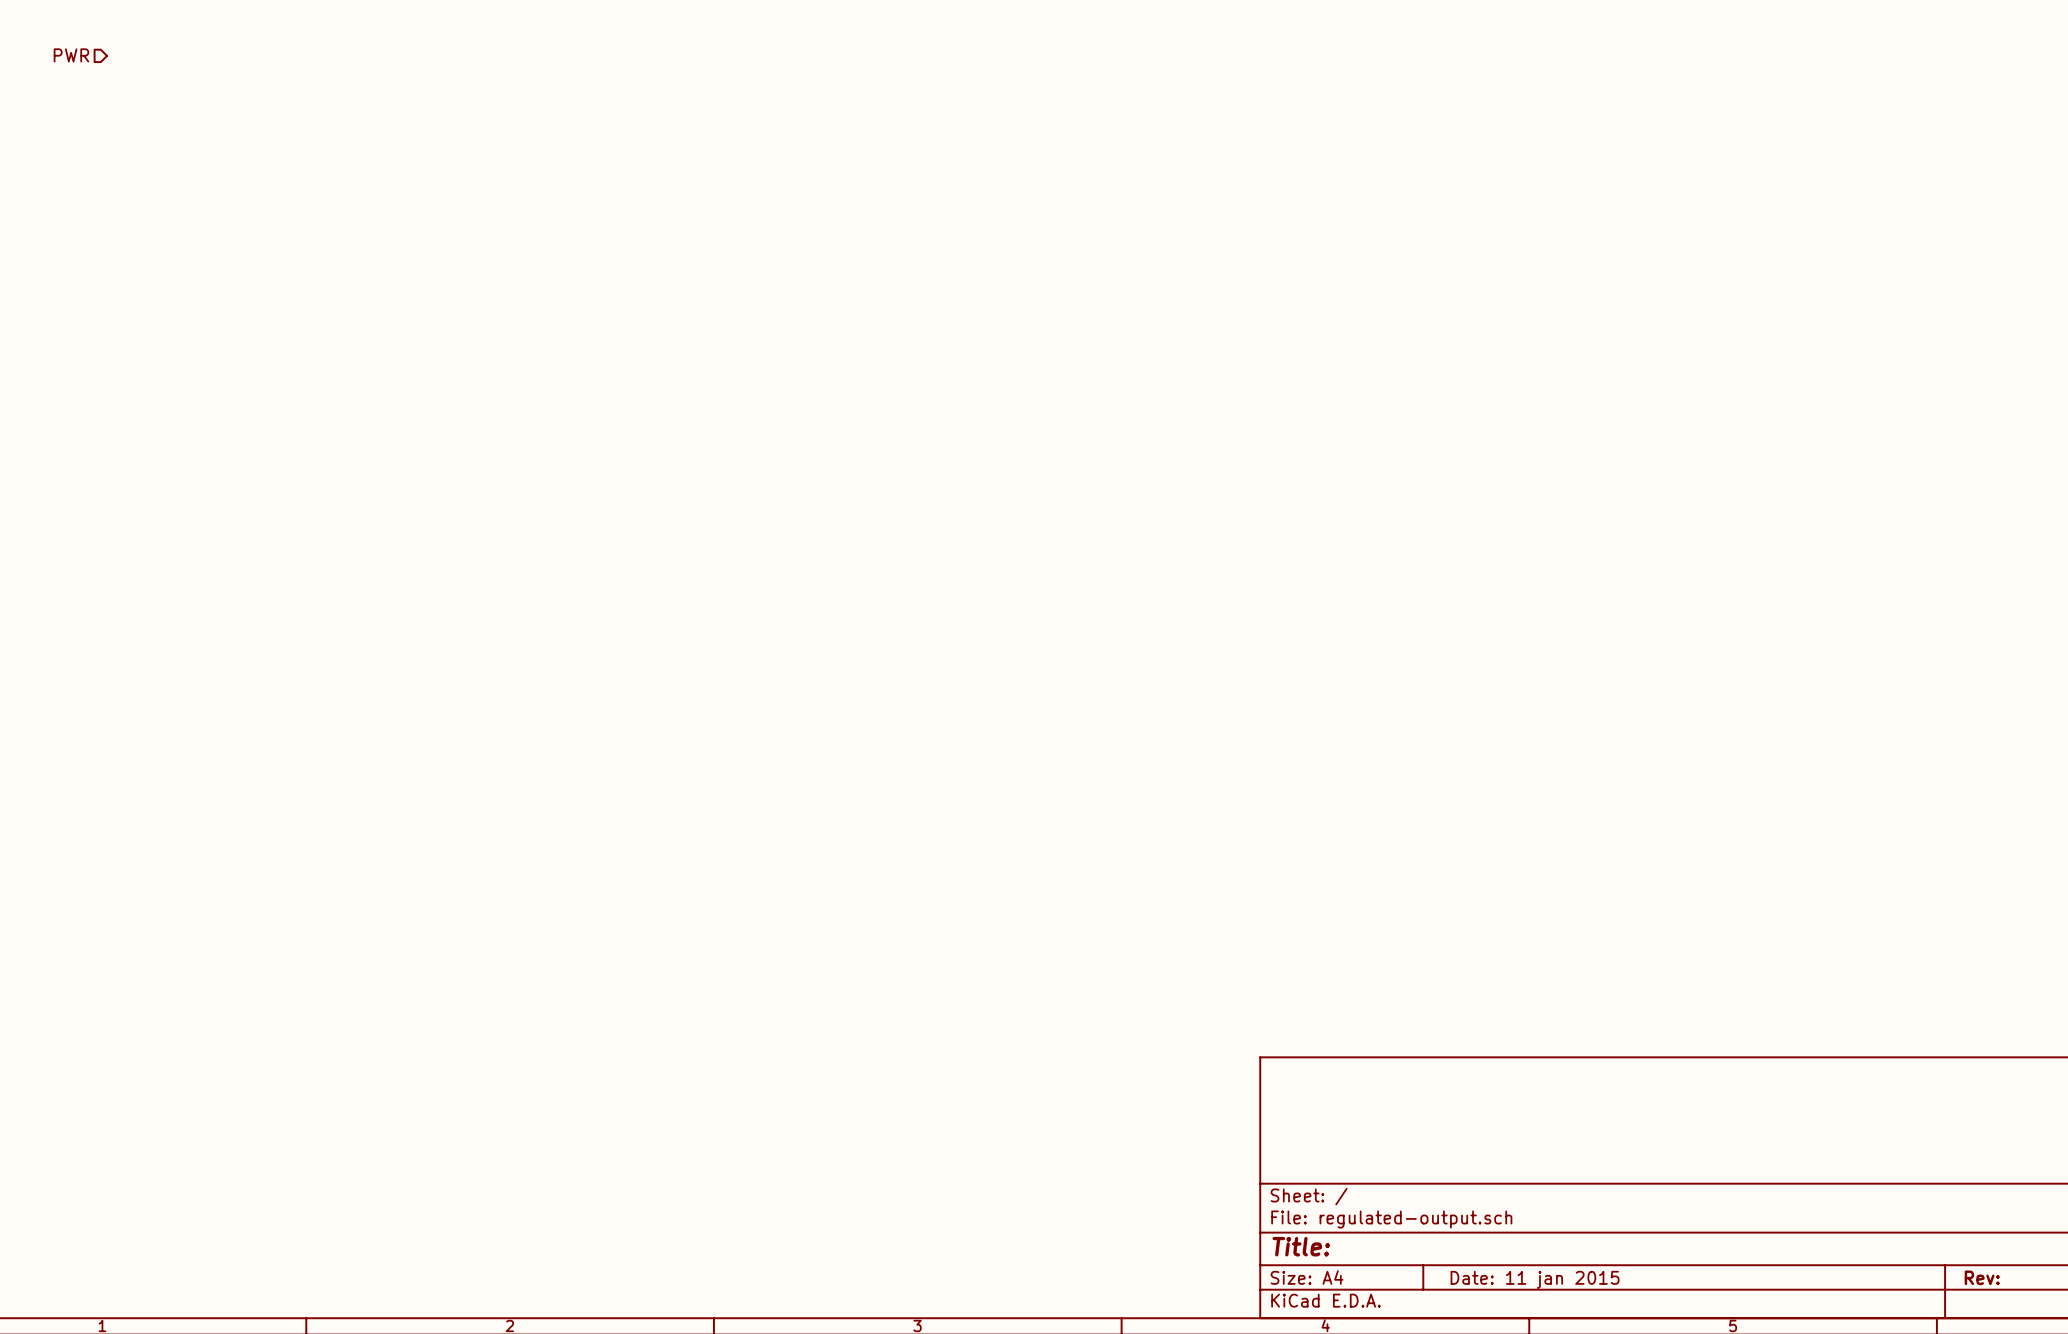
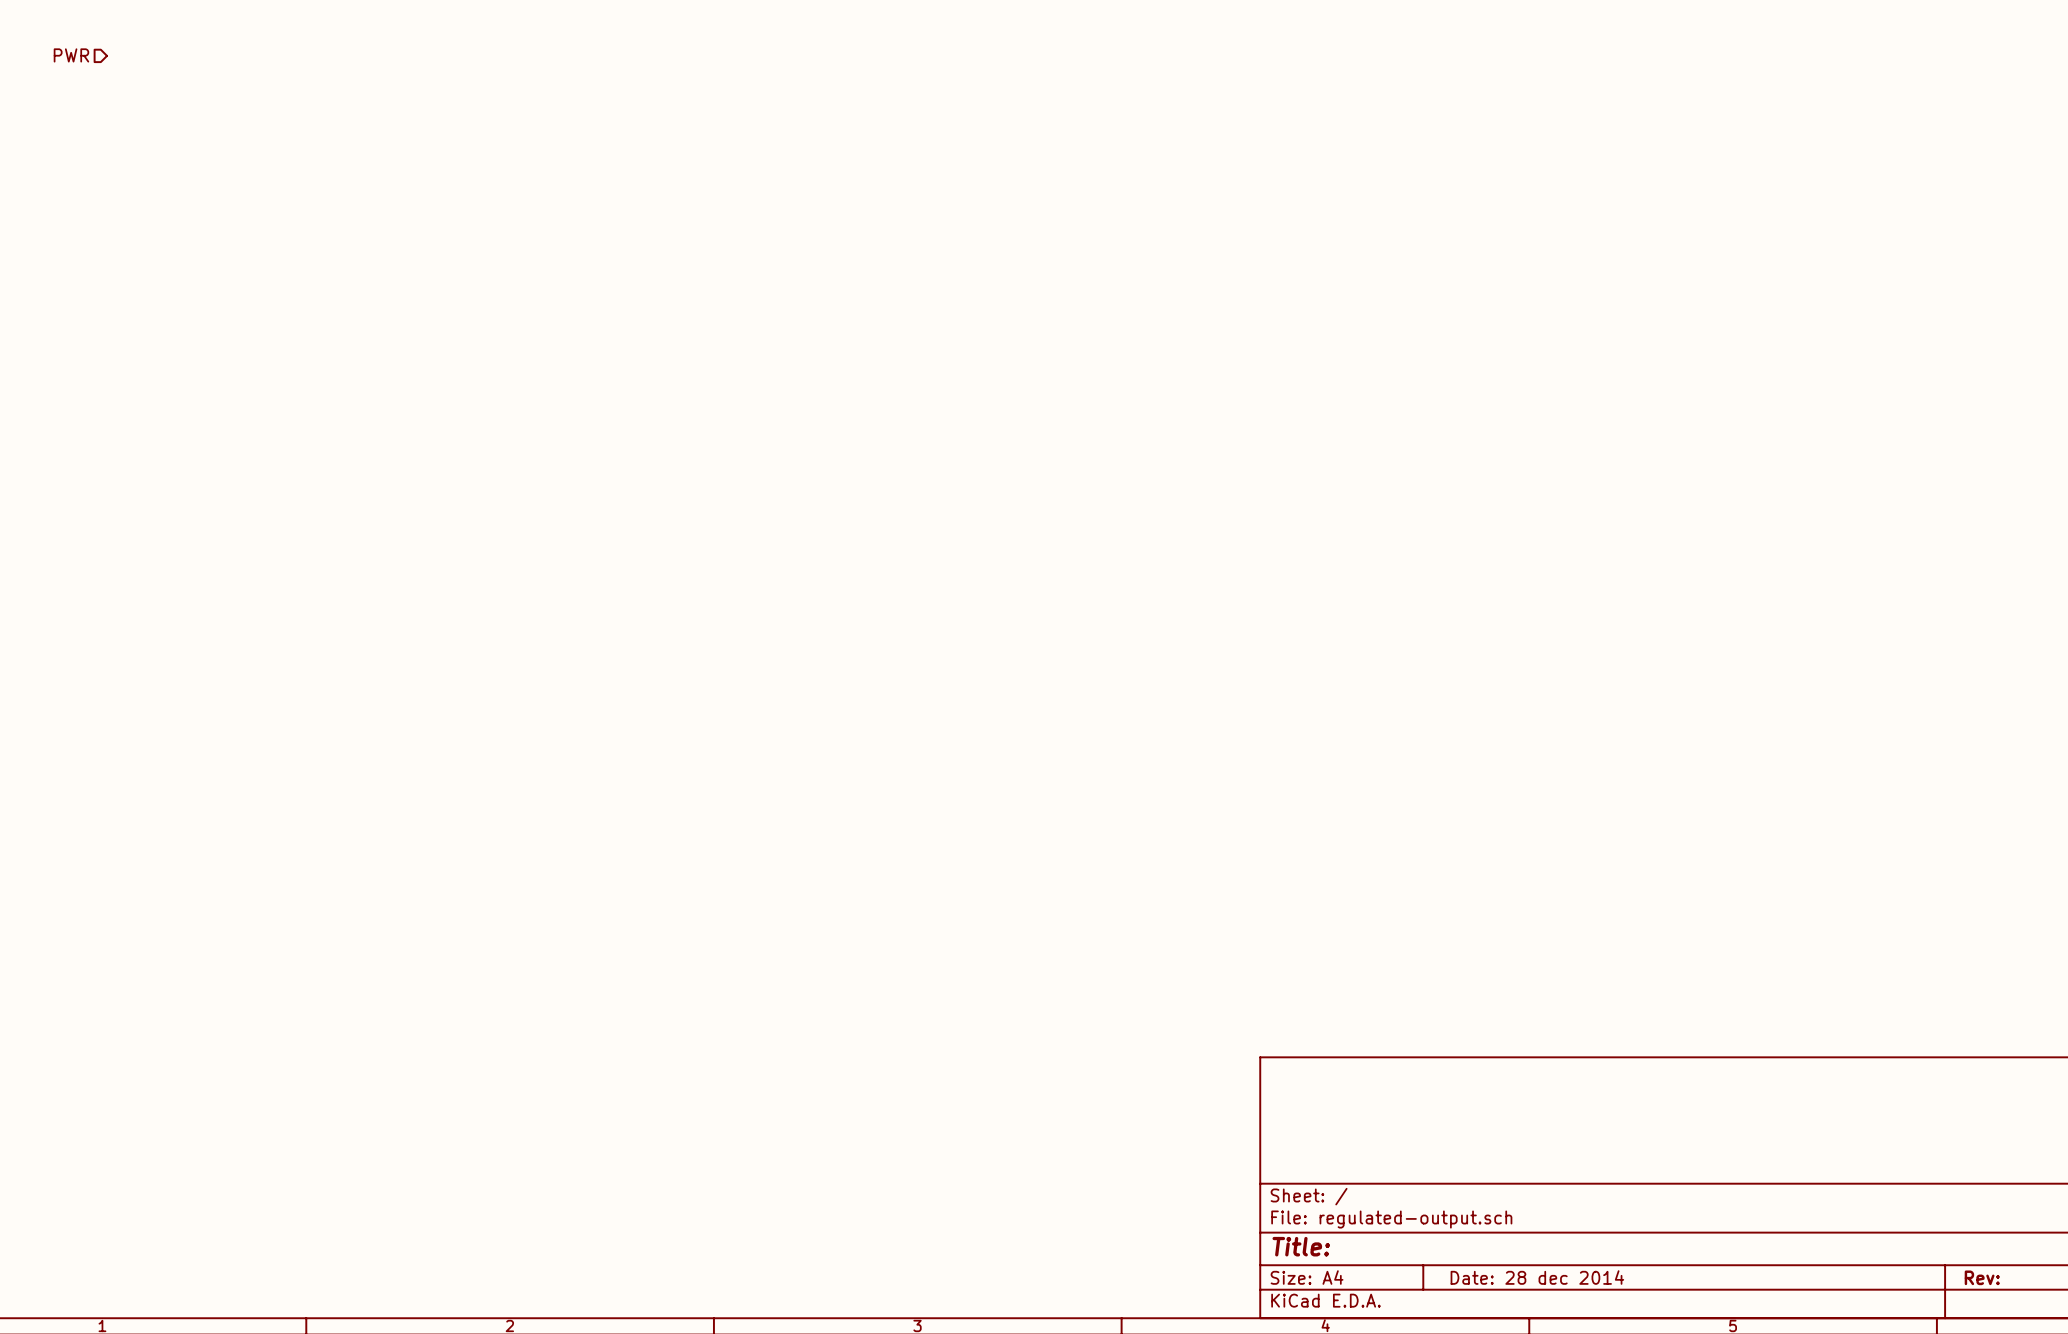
title block: Date: 11 jan 2015 (1535, 1279) -> Date: 28 dec 2014 (1537, 1277)

